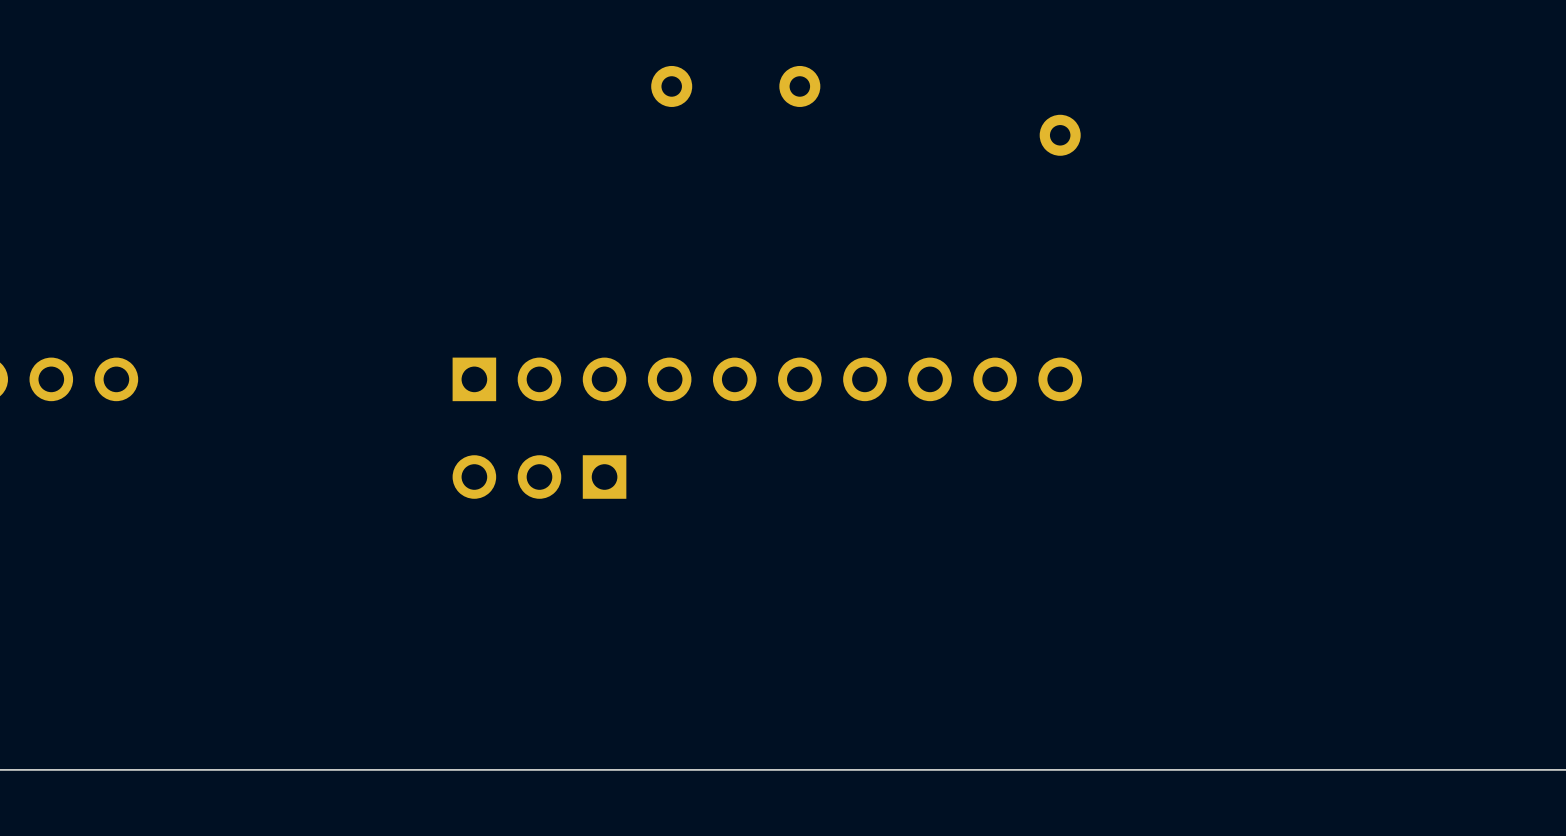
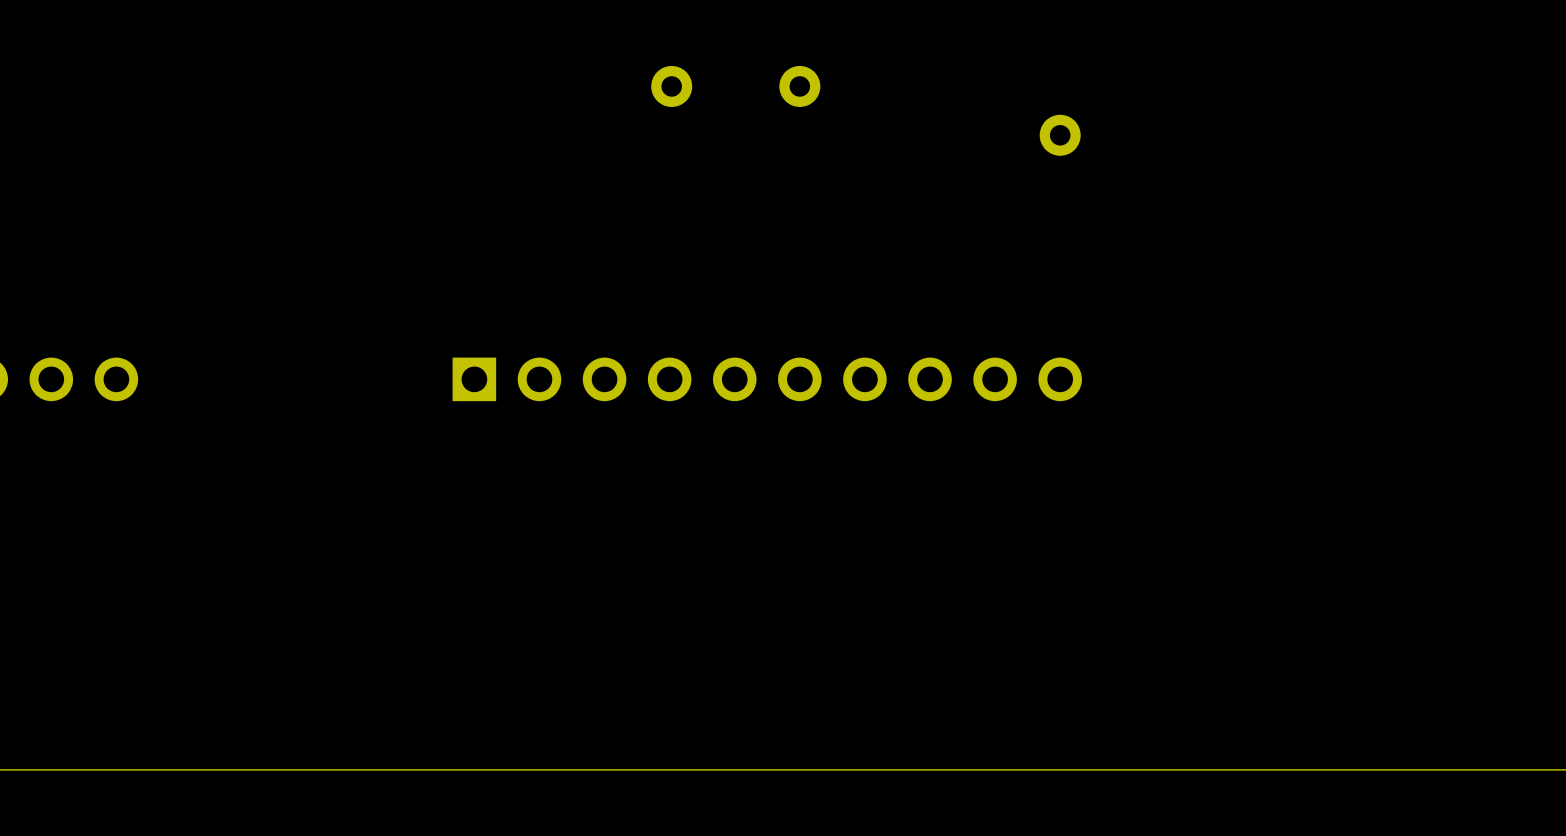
part: (539, 477) -> none

